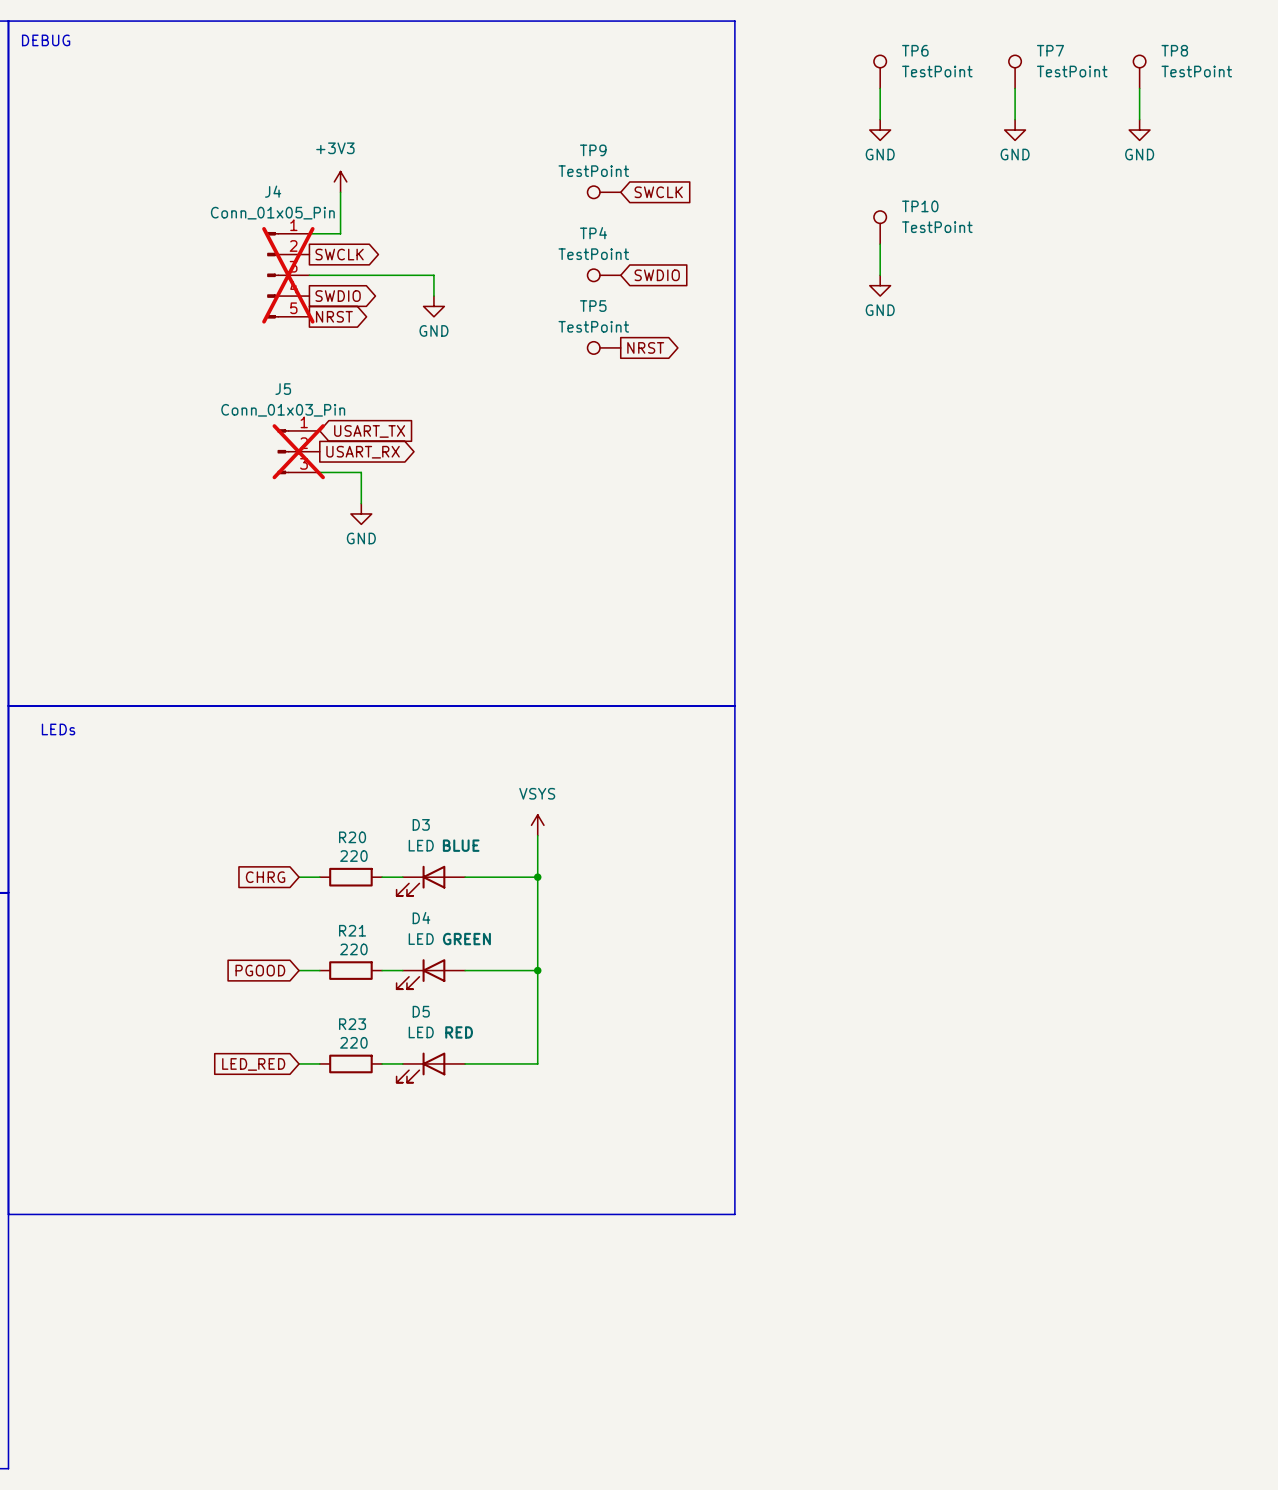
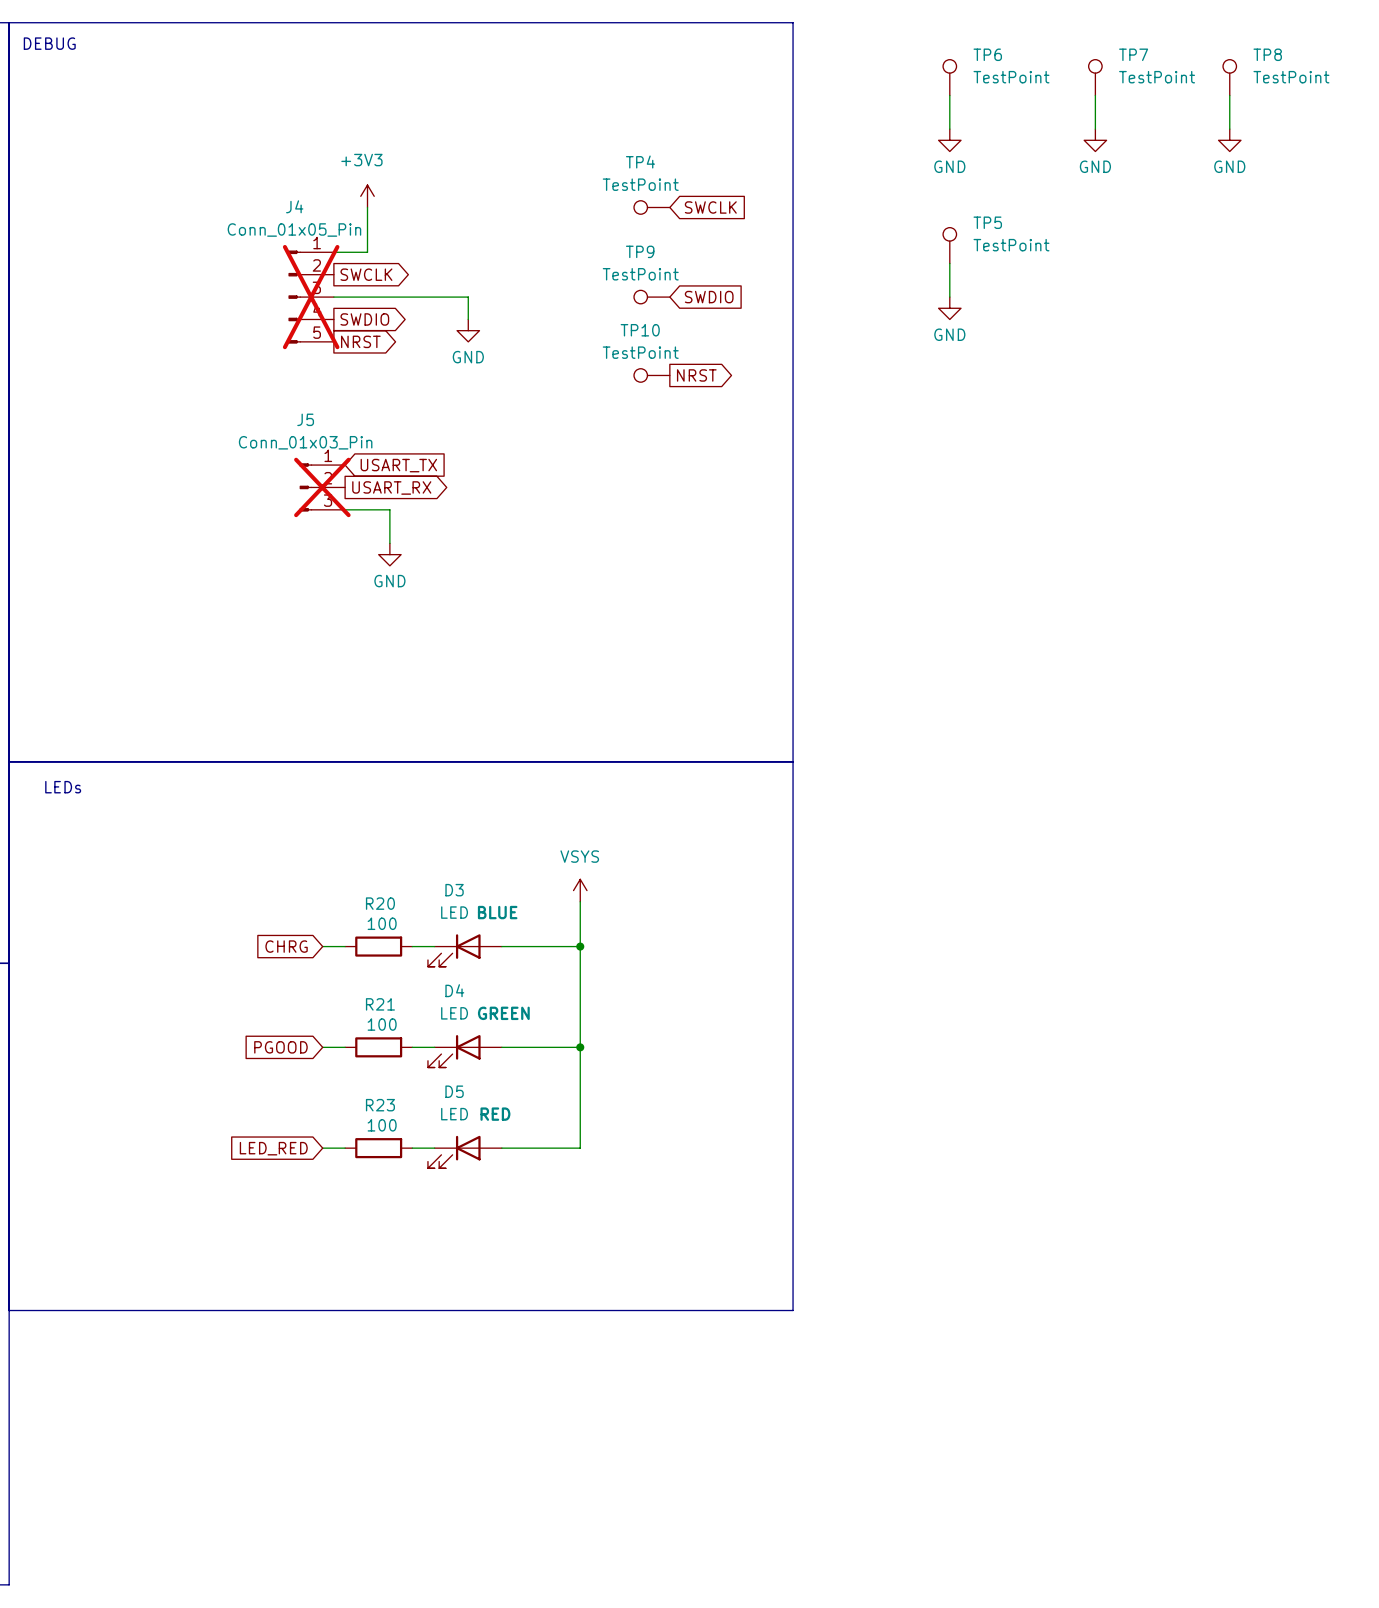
TP9 name: TP9 (593, 150) -> TP4 (640, 162)
TP10 name: TP10 (920, 206) -> TP5 (987, 222)
TP4 name: TP4 (593, 233) -> TP9 (640, 251)
TP5 name: TP5 (593, 306) -> TP10 (640, 330)
R20 value: 220 (353, 856) -> 100 (382, 923)
R21 value: 220 (353, 949) -> 100 (382, 1024)
R23 value: 220 (353, 1042) -> 100 (382, 1125)

